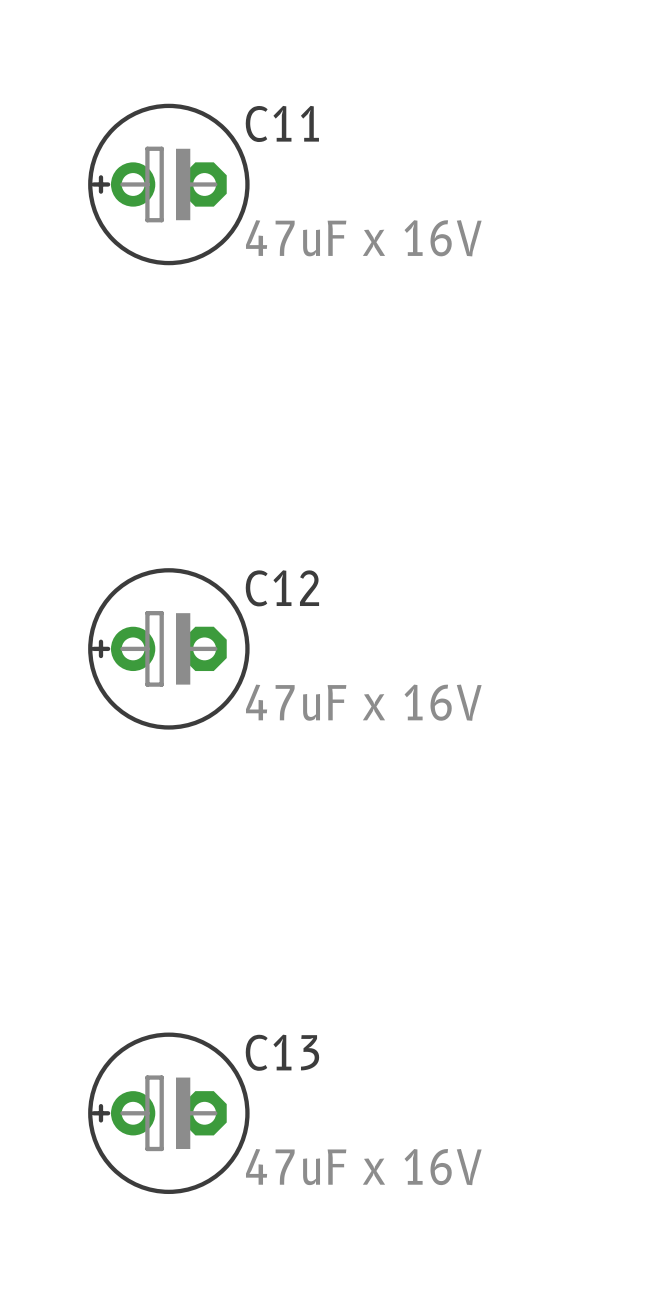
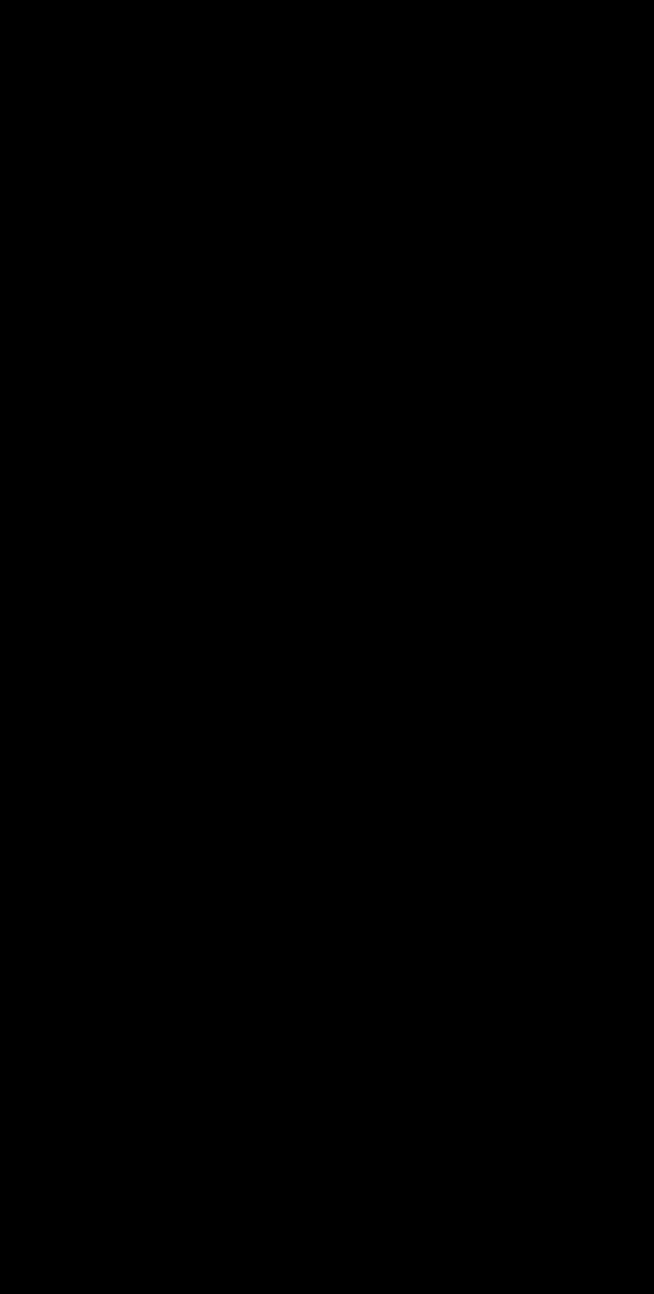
C11: 47uF x 16V (168, 184) -> none
C12: 47uF x 16V (168, 648) -> none
C13: 47uF x 16V (168, 1113) -> none

